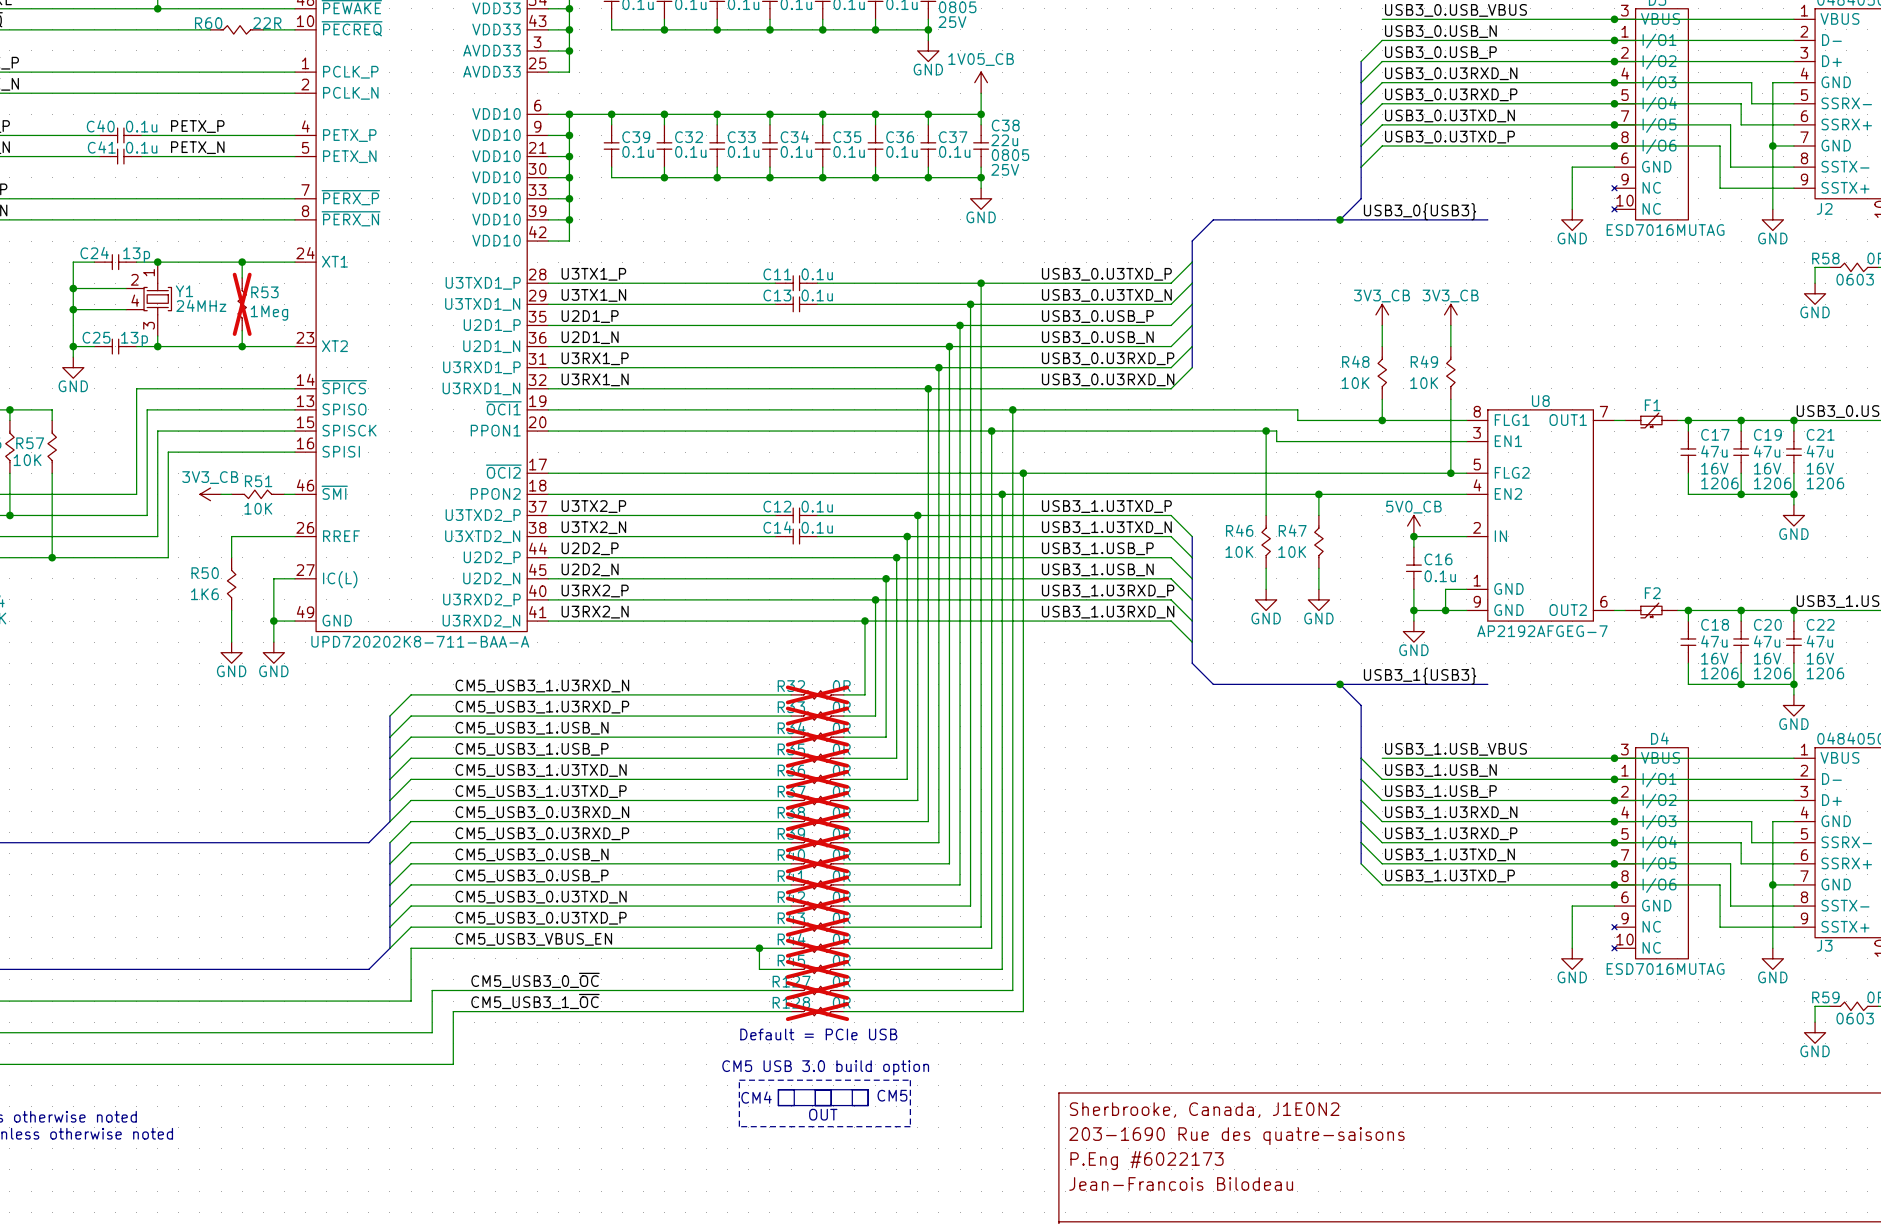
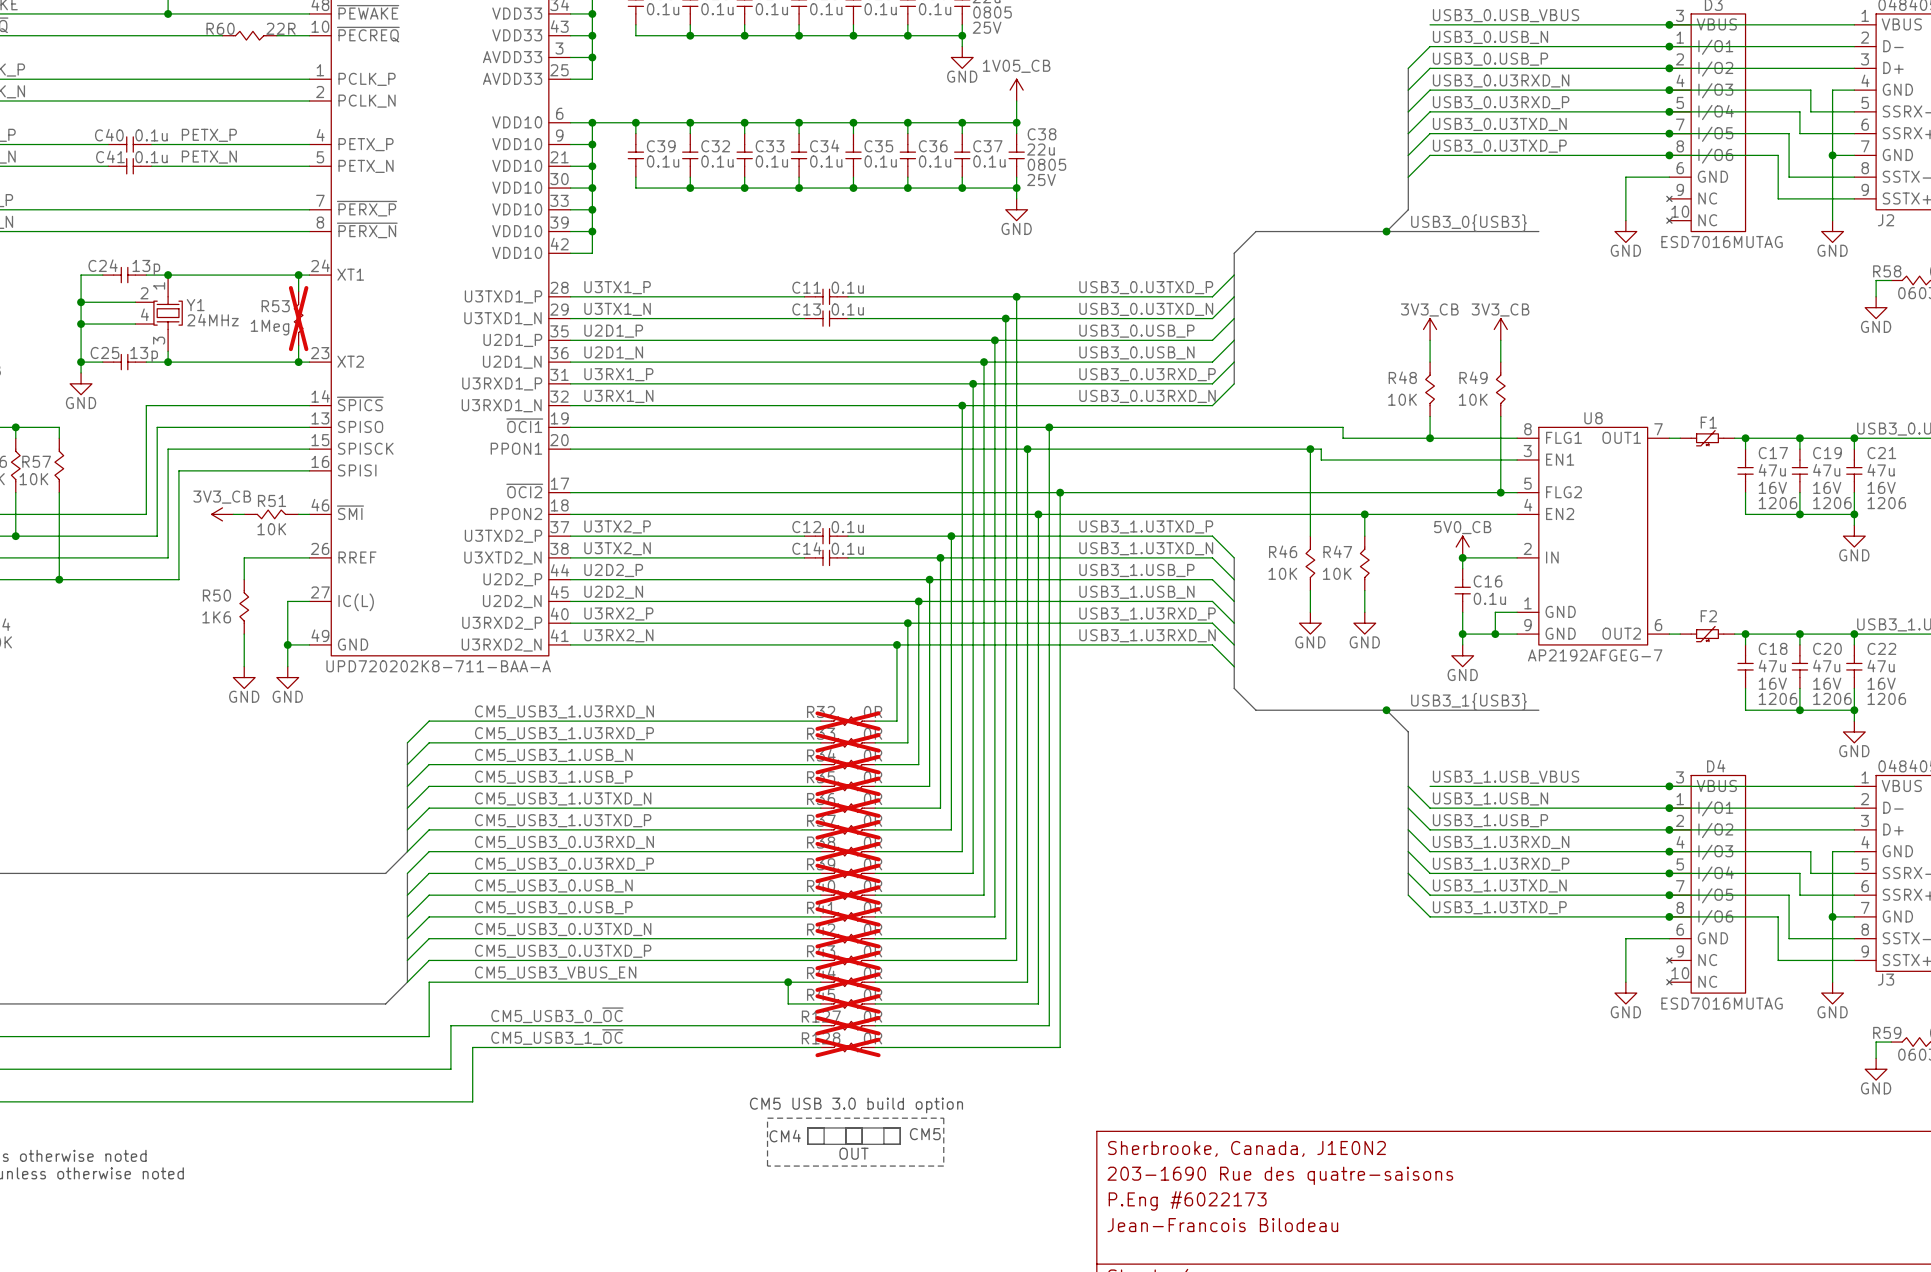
wire: (242, 262) (242, 277) -> (298, 275) (298, 291)
junction position: (242, 262) -> (298, 275)
R53 flip: as is (242, 304) -> left-right (298, 318)
R53 position: (242, 304) -> (298, 318)
wire: (242, 330) (242, 346) -> (298, 345) (298, 362)
junction position: (242, 346) -> (298, 362)
text: Default = PCIe USB (818, 1034) -> none

